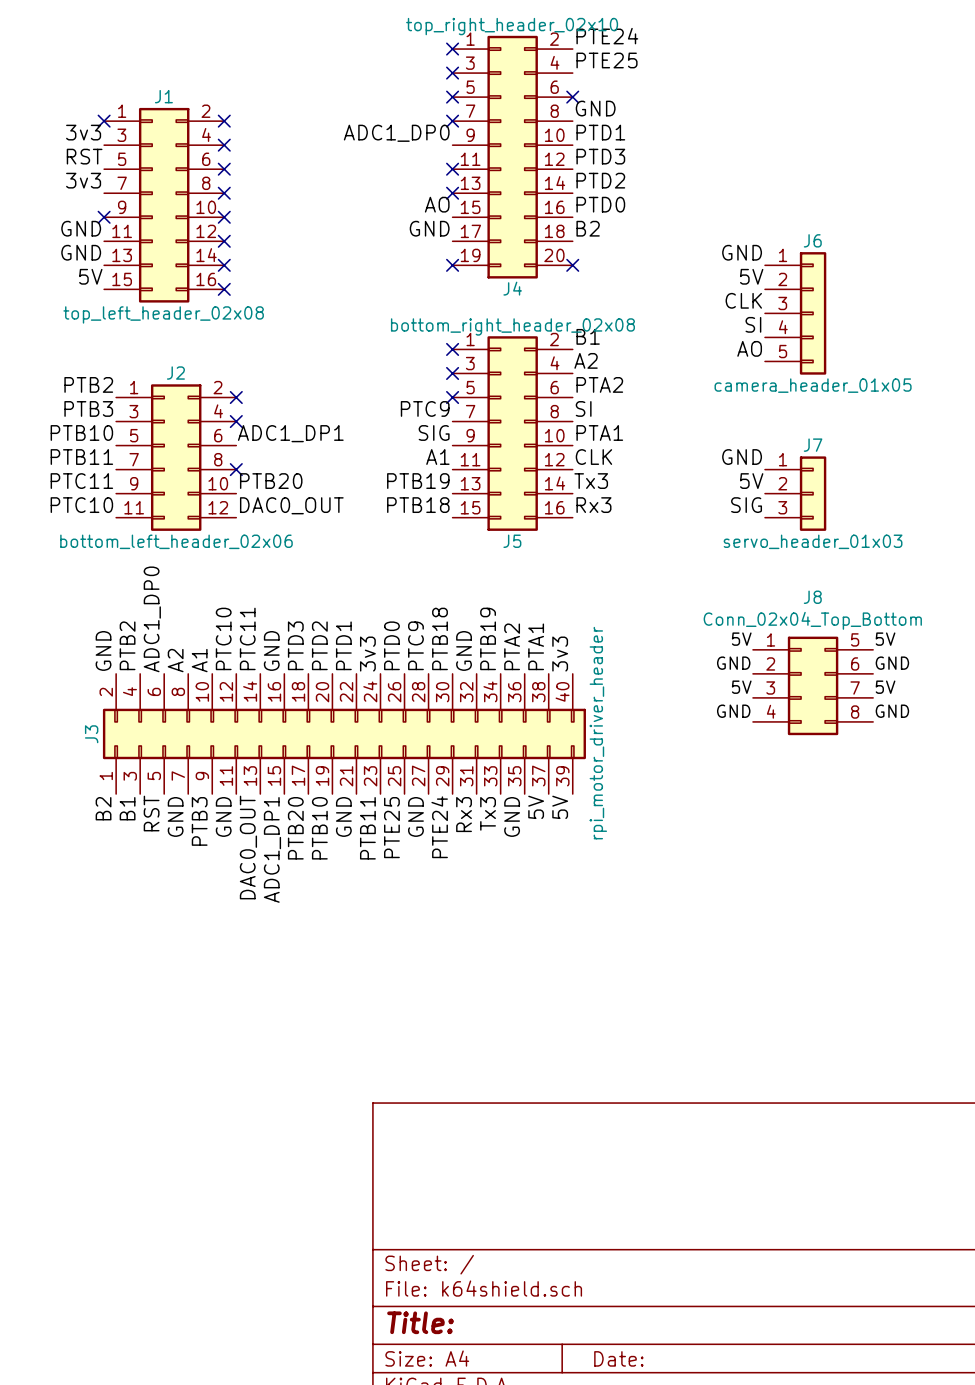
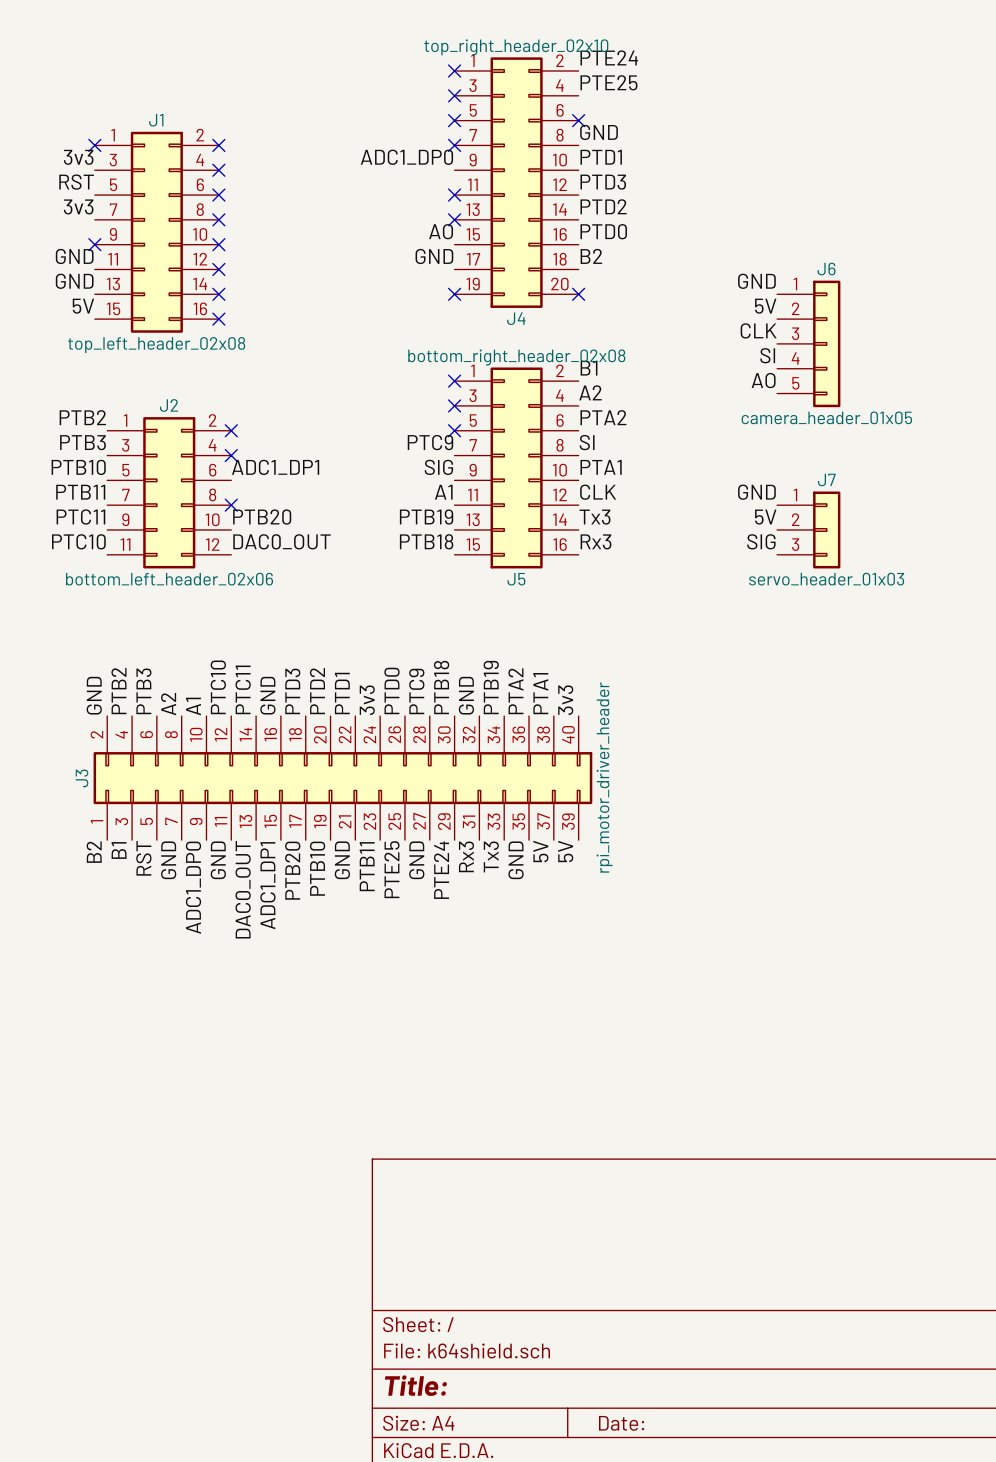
label: ADC1_DP0 (152, 619) -> PTB3 (143, 691)
label: 5V (741, 639) -> none
label: 5V (885, 639) -> none
label: GND (733, 663) -> none
label: GND (892, 663) -> none
J8: Conn_02x04_Top_Bottom (813, 685) -> none
label: 5V (741, 687) -> none
label: 5V (885, 687) -> none
label: GND (733, 711) -> none
label: GND (892, 711) -> none
label: PTB3 (199, 821) -> ADC1_DP0 (193, 887)

